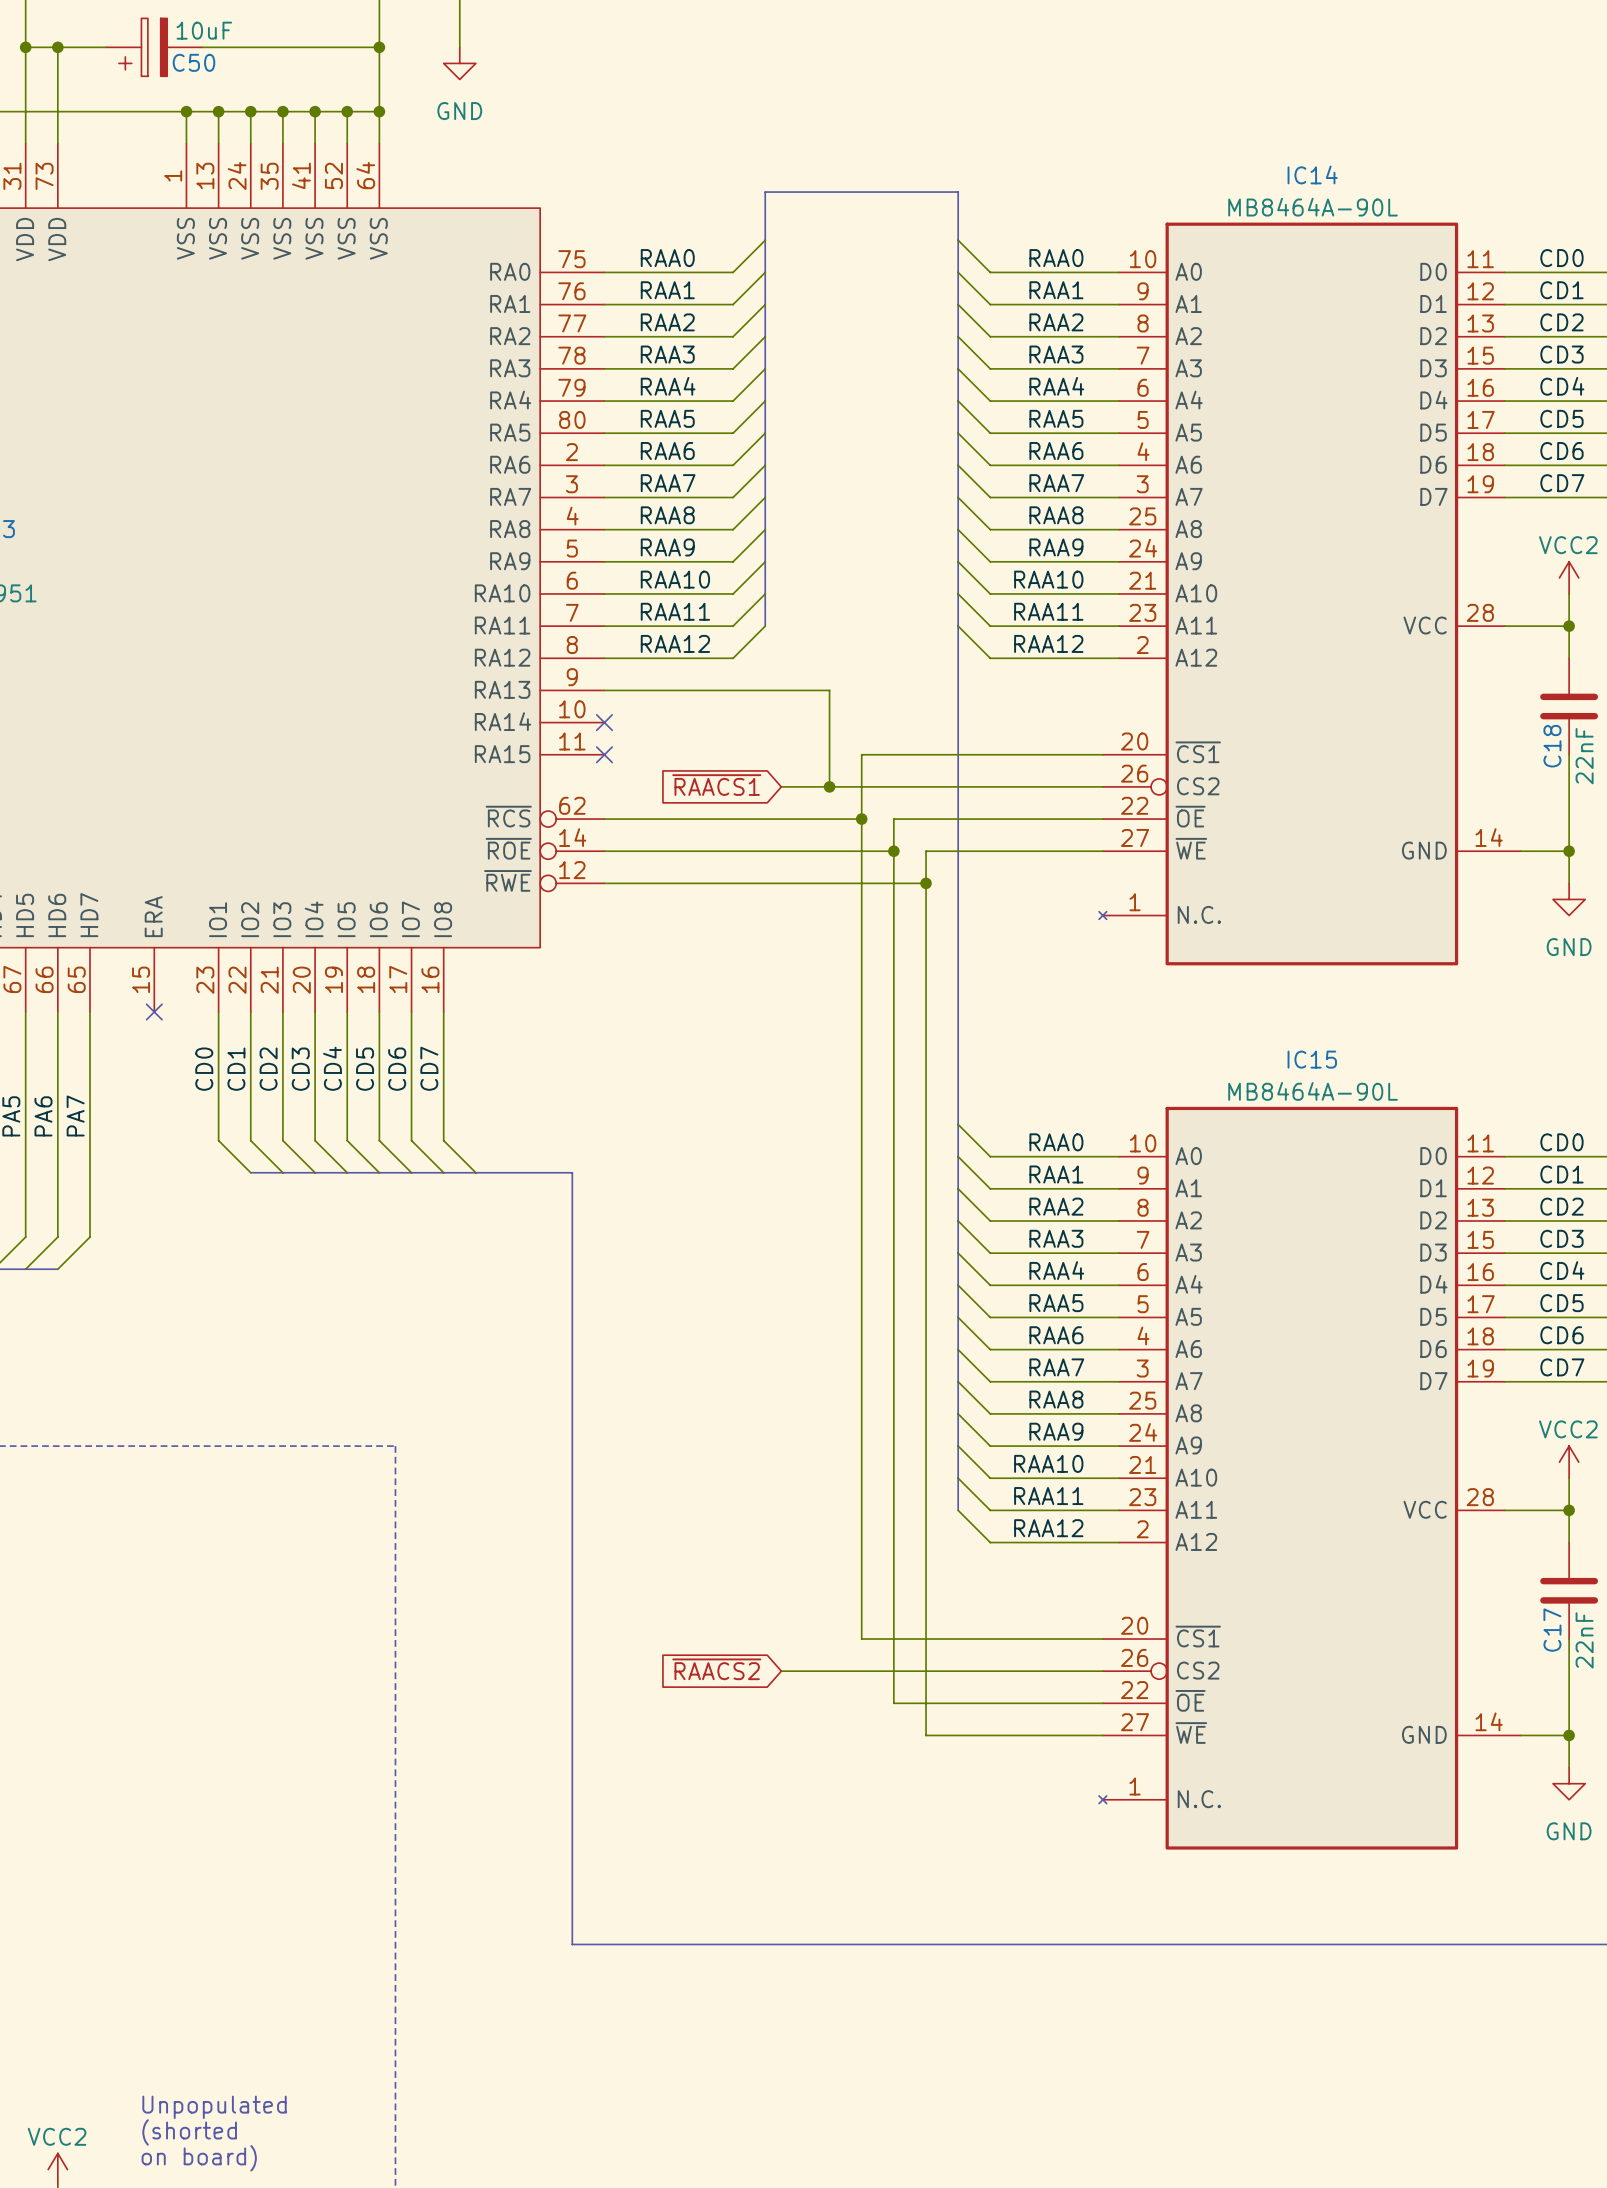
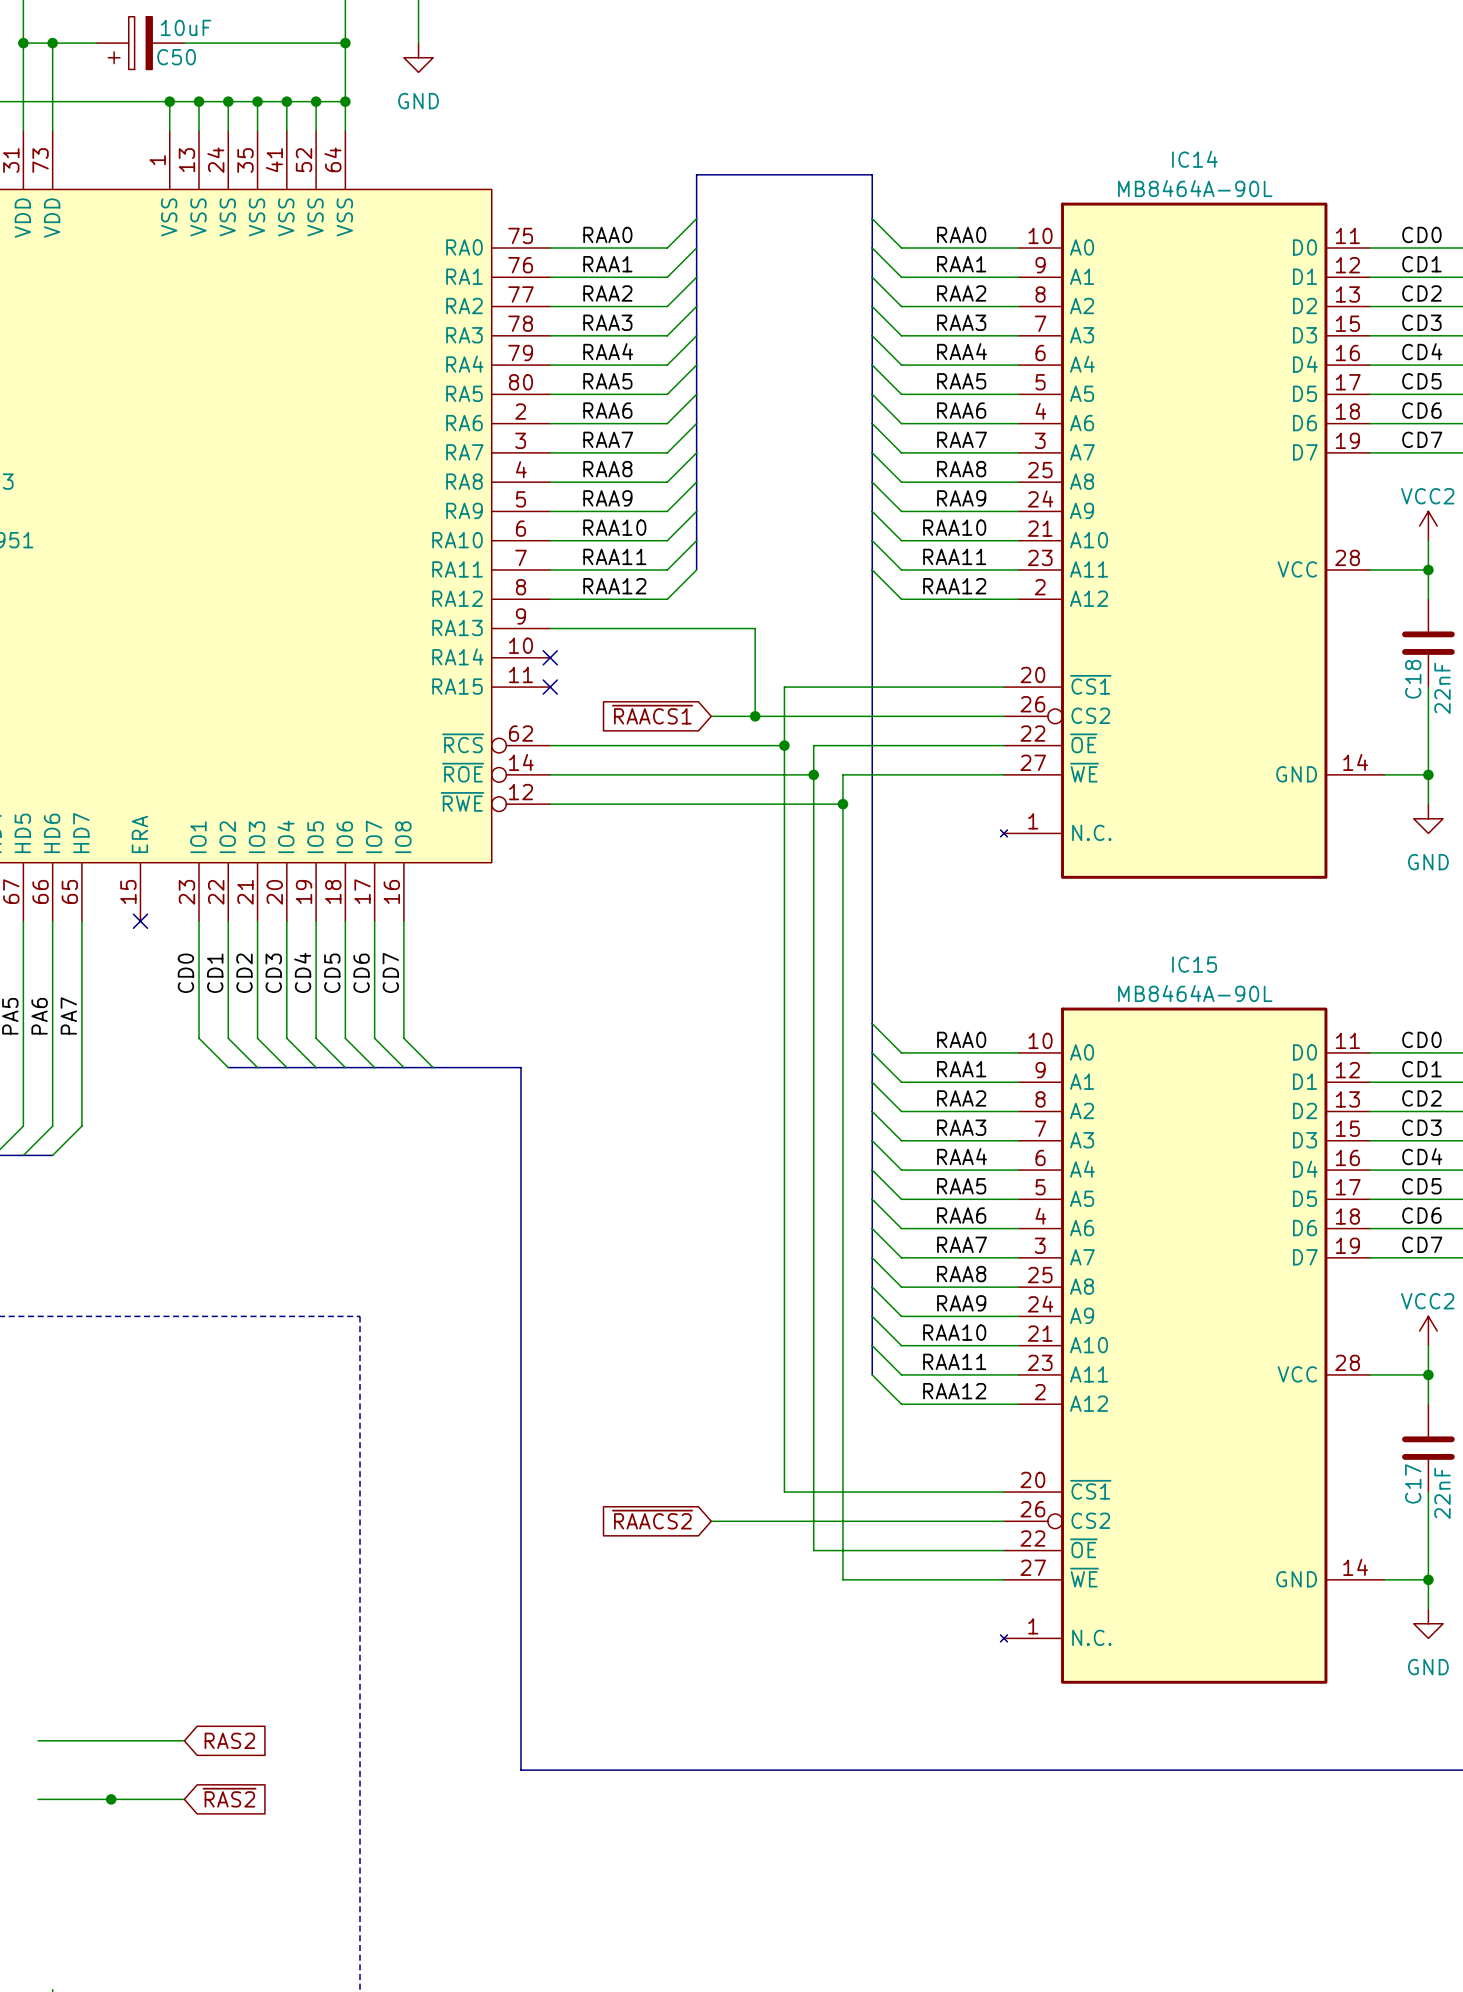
wire: none -> (38, 1740) (184, 1740)
global label: none -> RAS2 (229, 1740)
global label: none -> ~{RAS2} (229, 1797)
wire: none -> (38, 1799) (184, 1799)
junction: none -> (111, 1799)
text: Unpopulated (214, 2107) -> none
text: (shorted (189, 2132) -> none
text: on board) (199, 2158) -> none
power symbol: VCC2 (57, 2169) -> none

